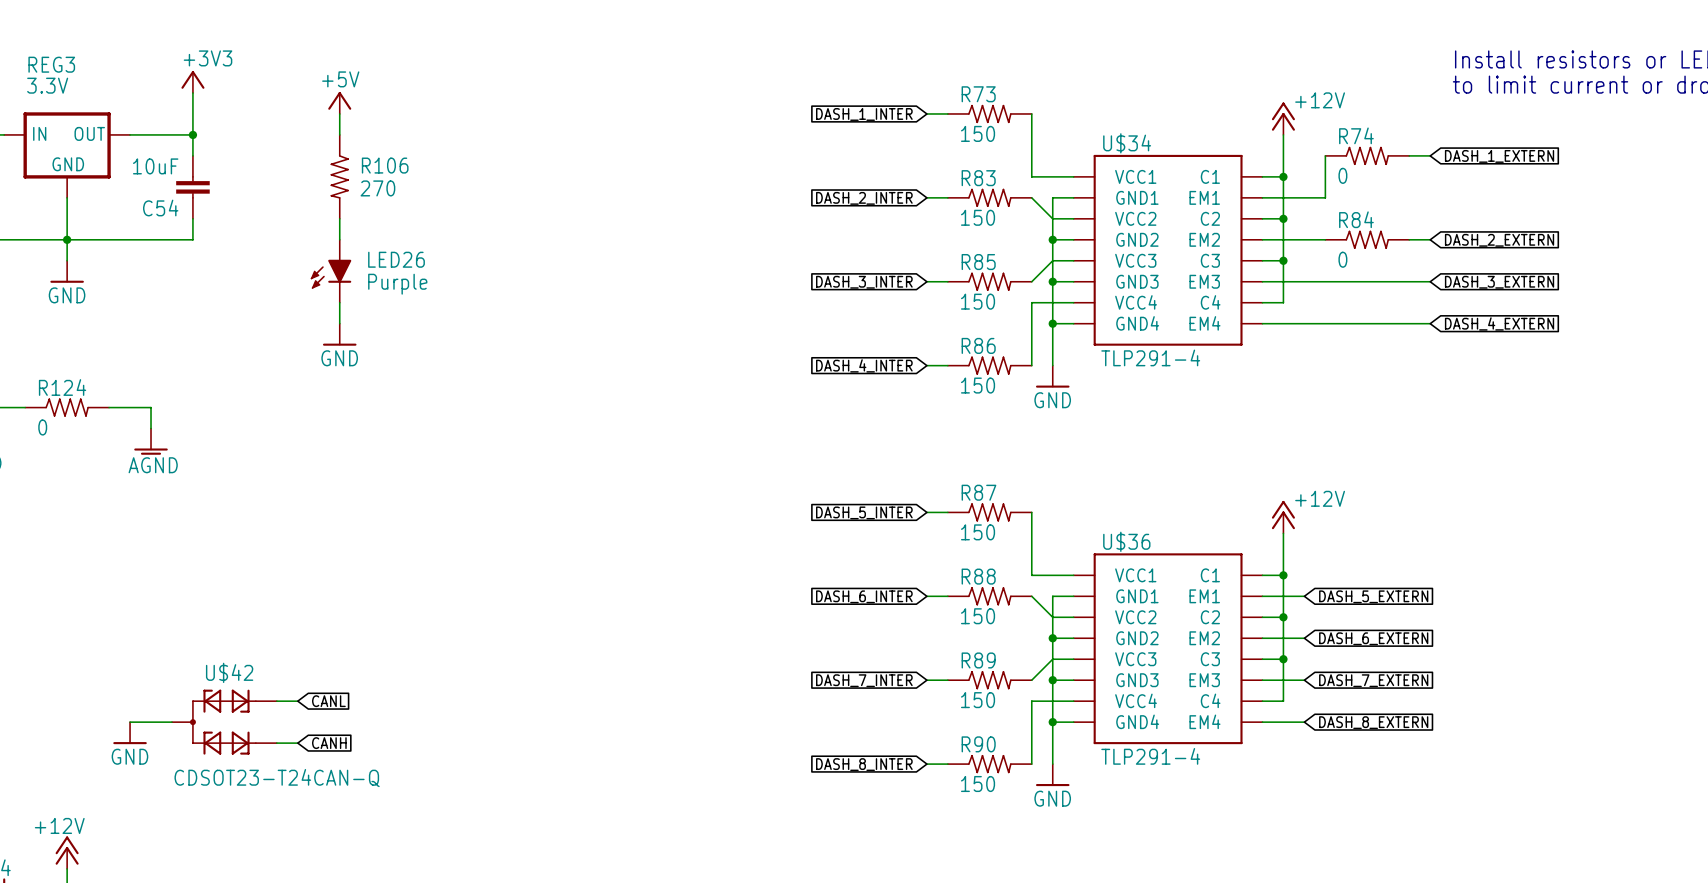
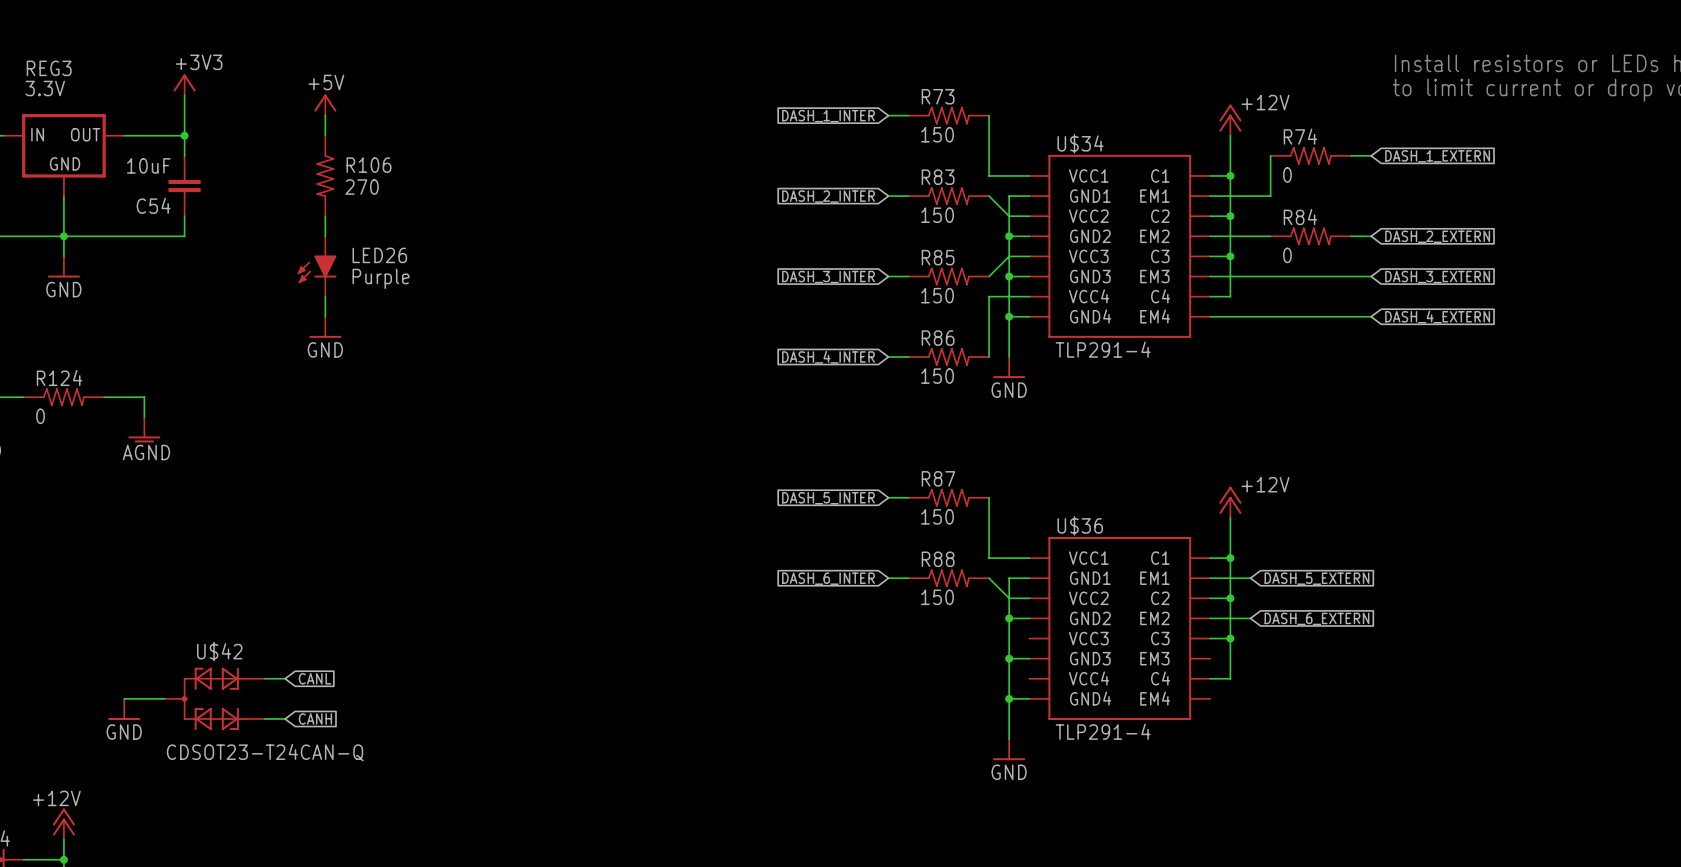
wire: (1073, 659) (1052, 659) (1031, 680) -> none
global label: DASH_7_INTER (864, 680) -> none
wire: (926, 680) (947, 680) -> none
R89: 150 (989, 680) -> none
wire: (1262, 680) (1304, 680) -> none
global label: DASH_7_EXTERN (1373, 680) -> none
wire: (1073, 701) (1031, 701) (1031, 764) -> none
wire: (1262, 722) (1304, 722) -> none
global label: DASH_8_EXTERN (1373, 722) -> none
global label: DASH_8_INTER (864, 764) -> none
wire: (926, 764) (947, 764) -> none
R90: 150 (989, 764) -> none

